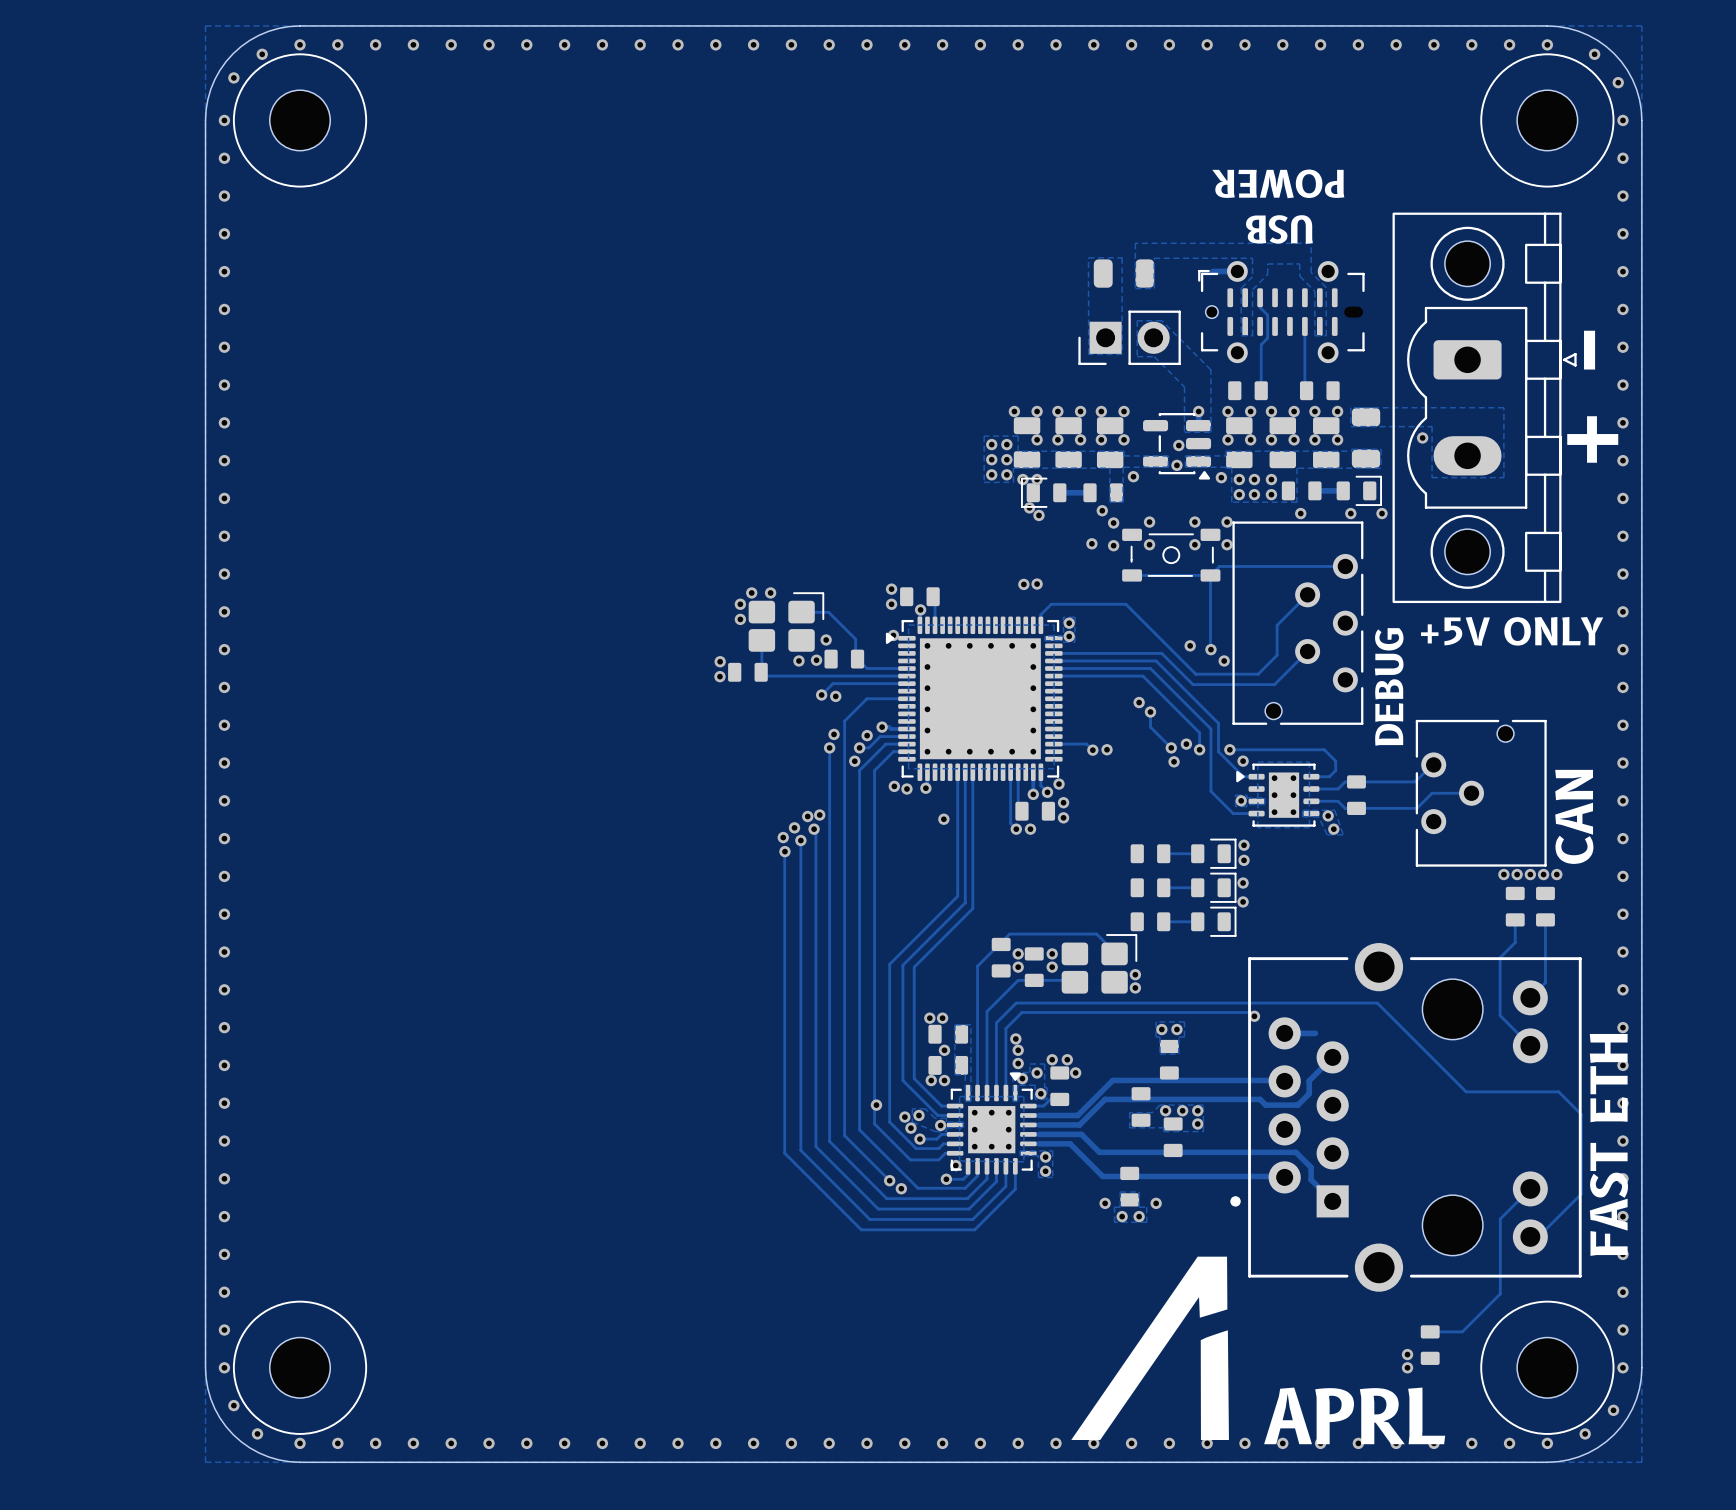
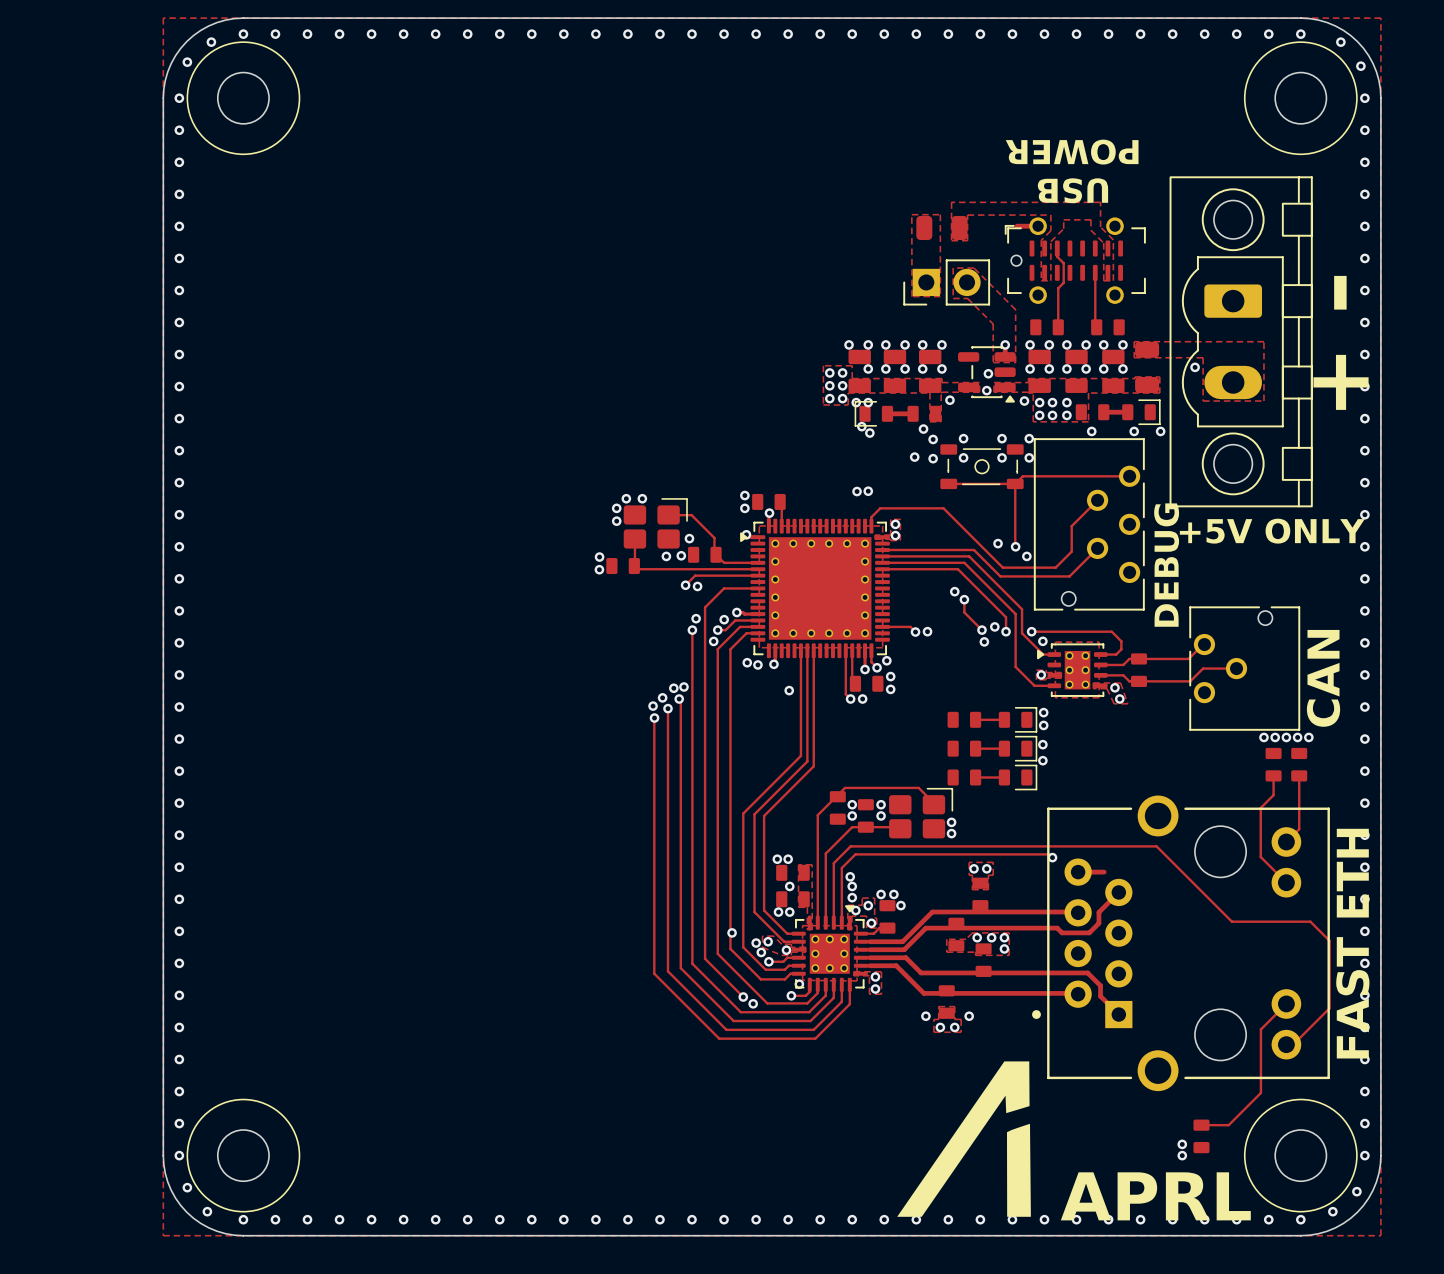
part footprint: [1392, 212, 1577, 604] -> [1169, 176, 1313, 508]

